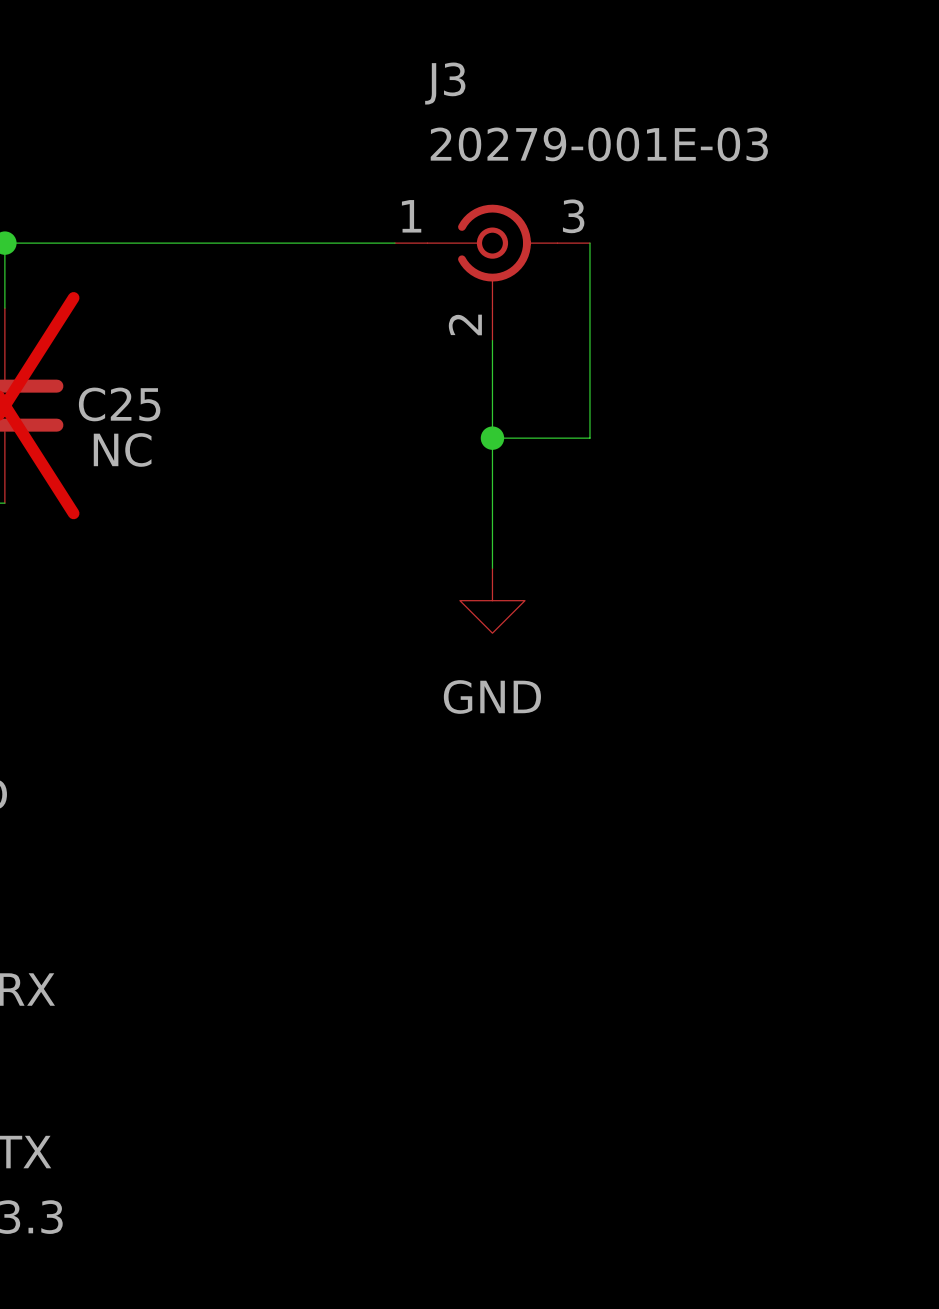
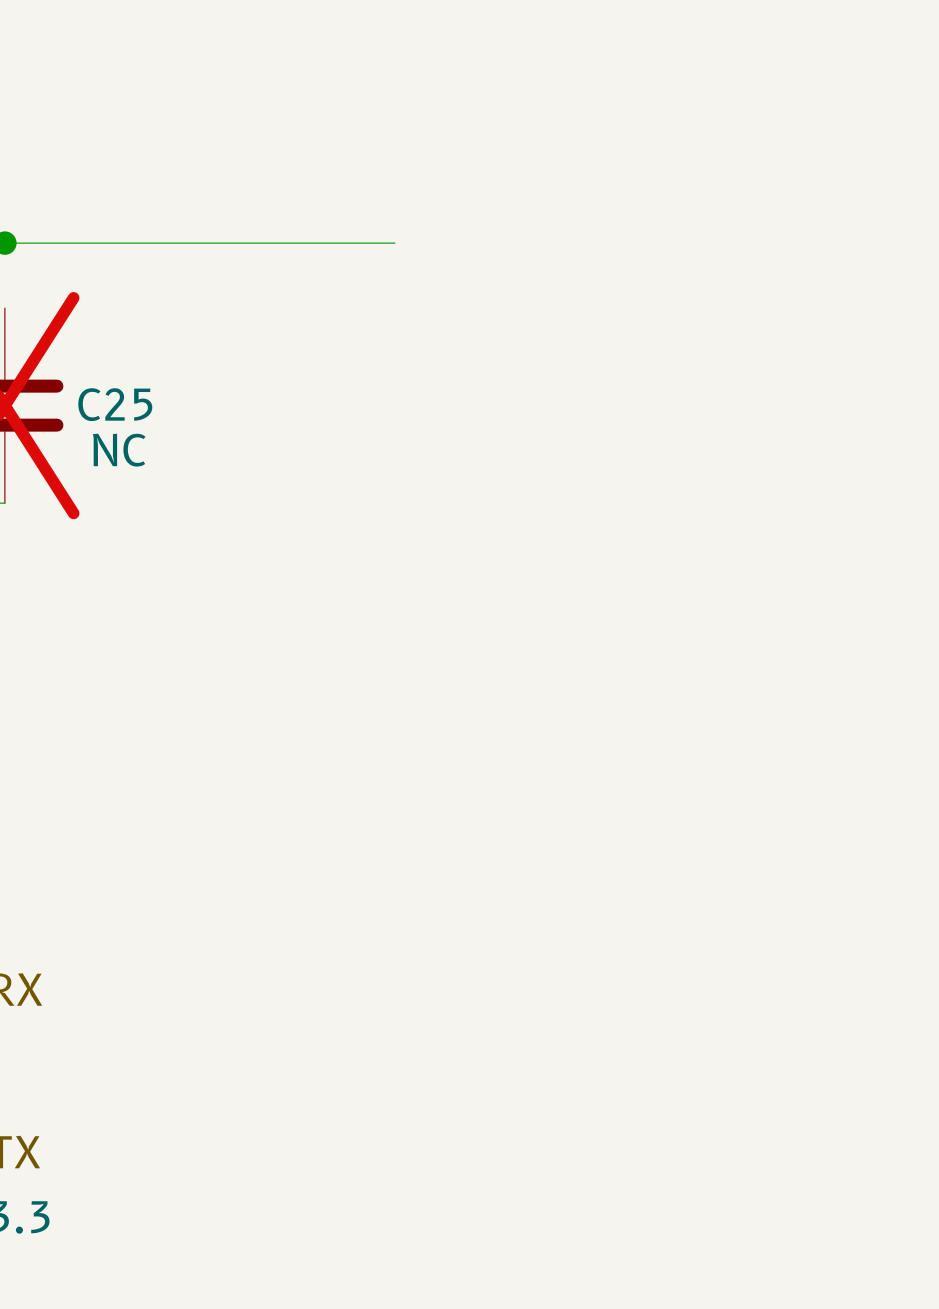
wire: (4, 243) (4, 308) -> none
wire: (589, 243) (589, 438) (492, 438) -> none
J3: 20279-001E-03 (492, 272) -> none
wire: (492, 340) (492, 568) -> none
junction: (492, 438) -> none
power symbol: GND (492, 600) -> none

